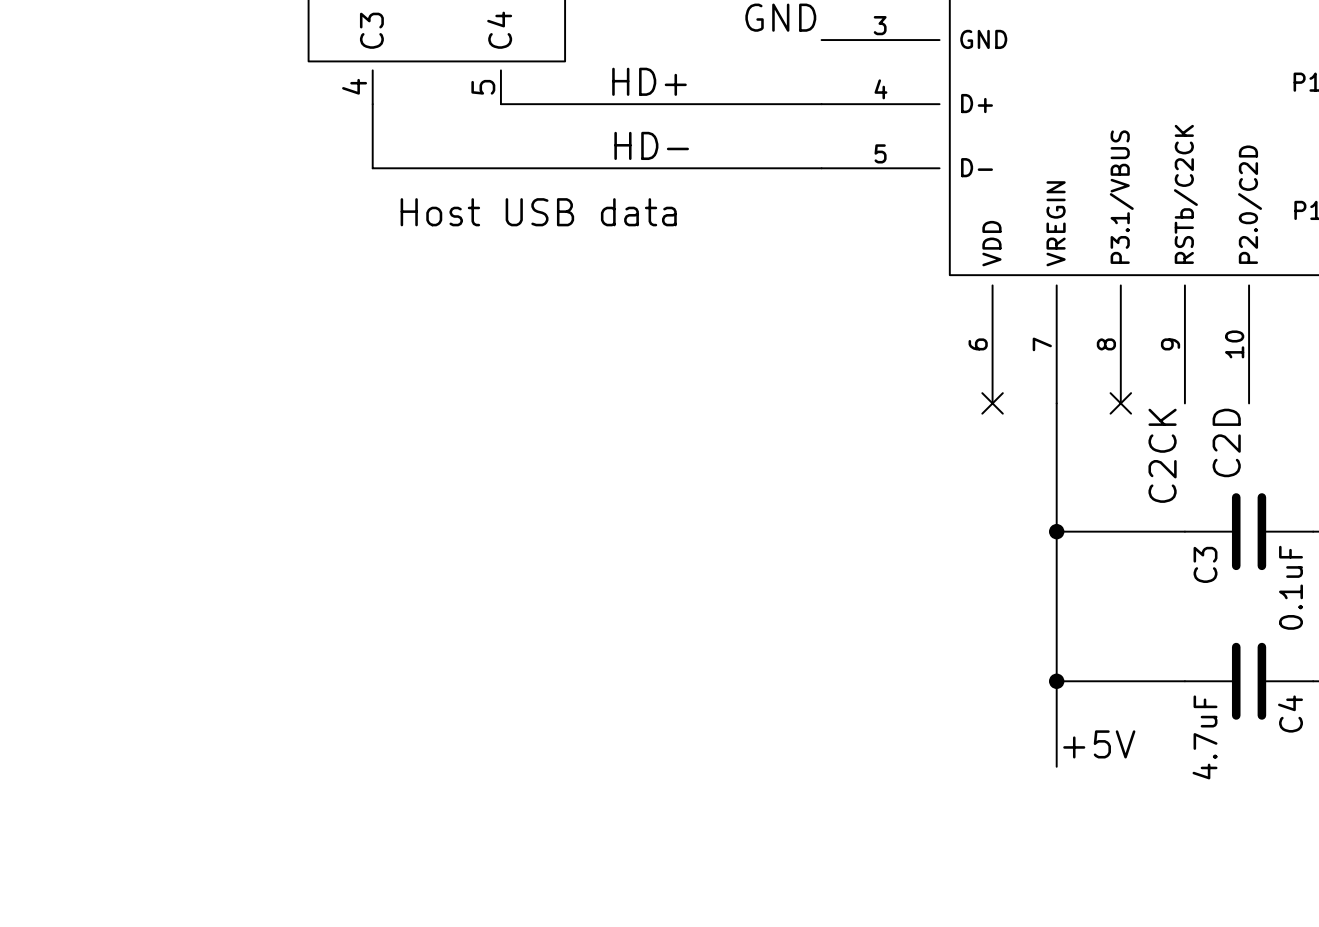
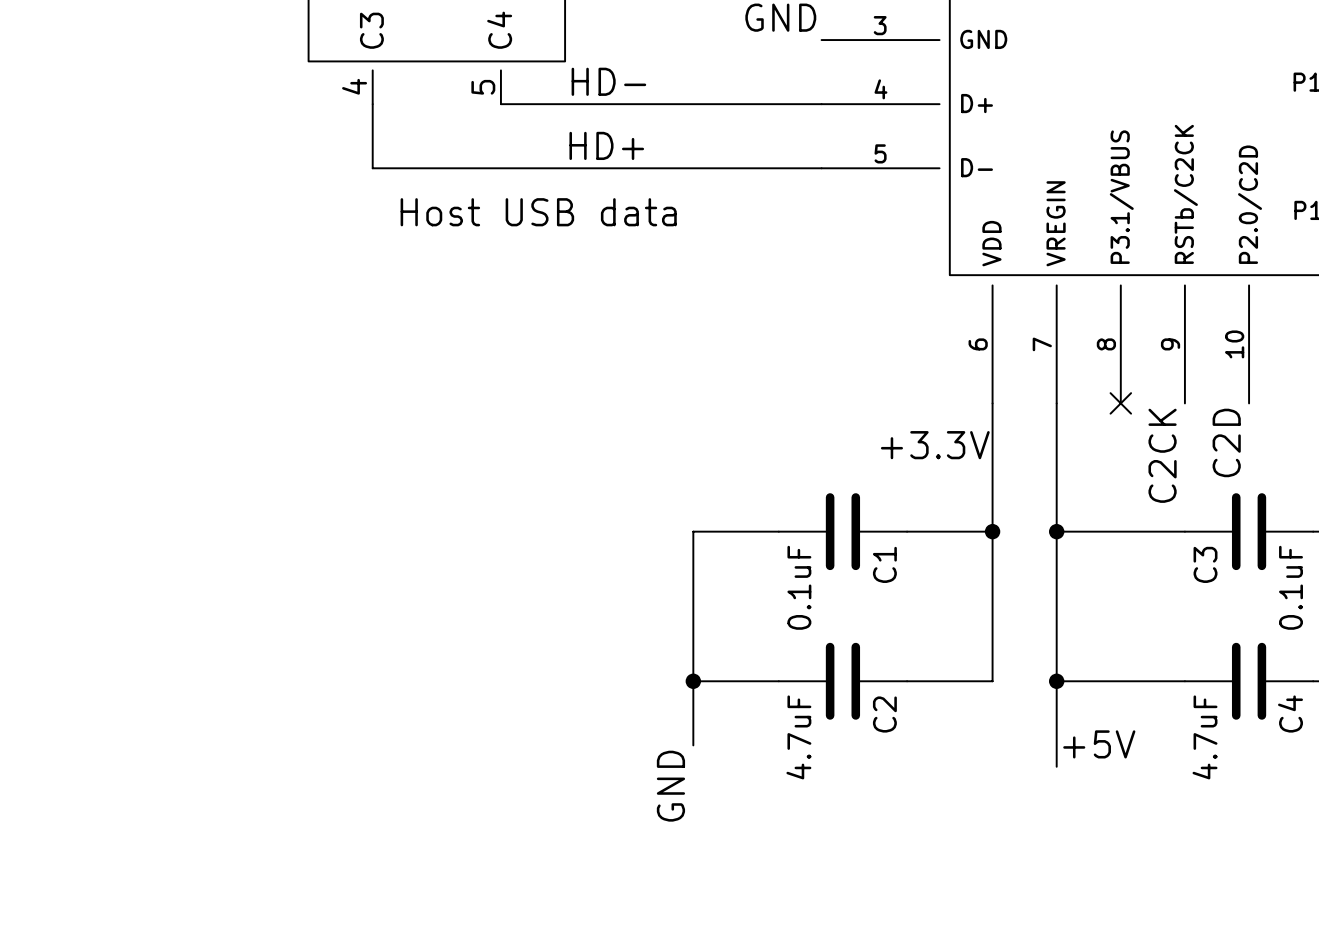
label position: HD+ (649, 81) -> HD+ (606, 145)
label position: HD- (651, 145) -> HD- (608, 81)
wire: none -> (992, 403) (992, 681) (907, 681)
no-connect mark: (992, 403) -> none
label: none -> +3.3V (935, 445)
wire: none -> (778, 531) (693, 531) (693, 745)
C1: none -> 0.1uF (842, 531)
wire: none -> (907, 531) (992, 531)
junction: none -> (992, 531)
wire: none -> (693, 681) (778, 681)
junction: none -> (693, 681)
C2: none -> 4.7uF (842, 681)
label: none -> GND (670, 786)

